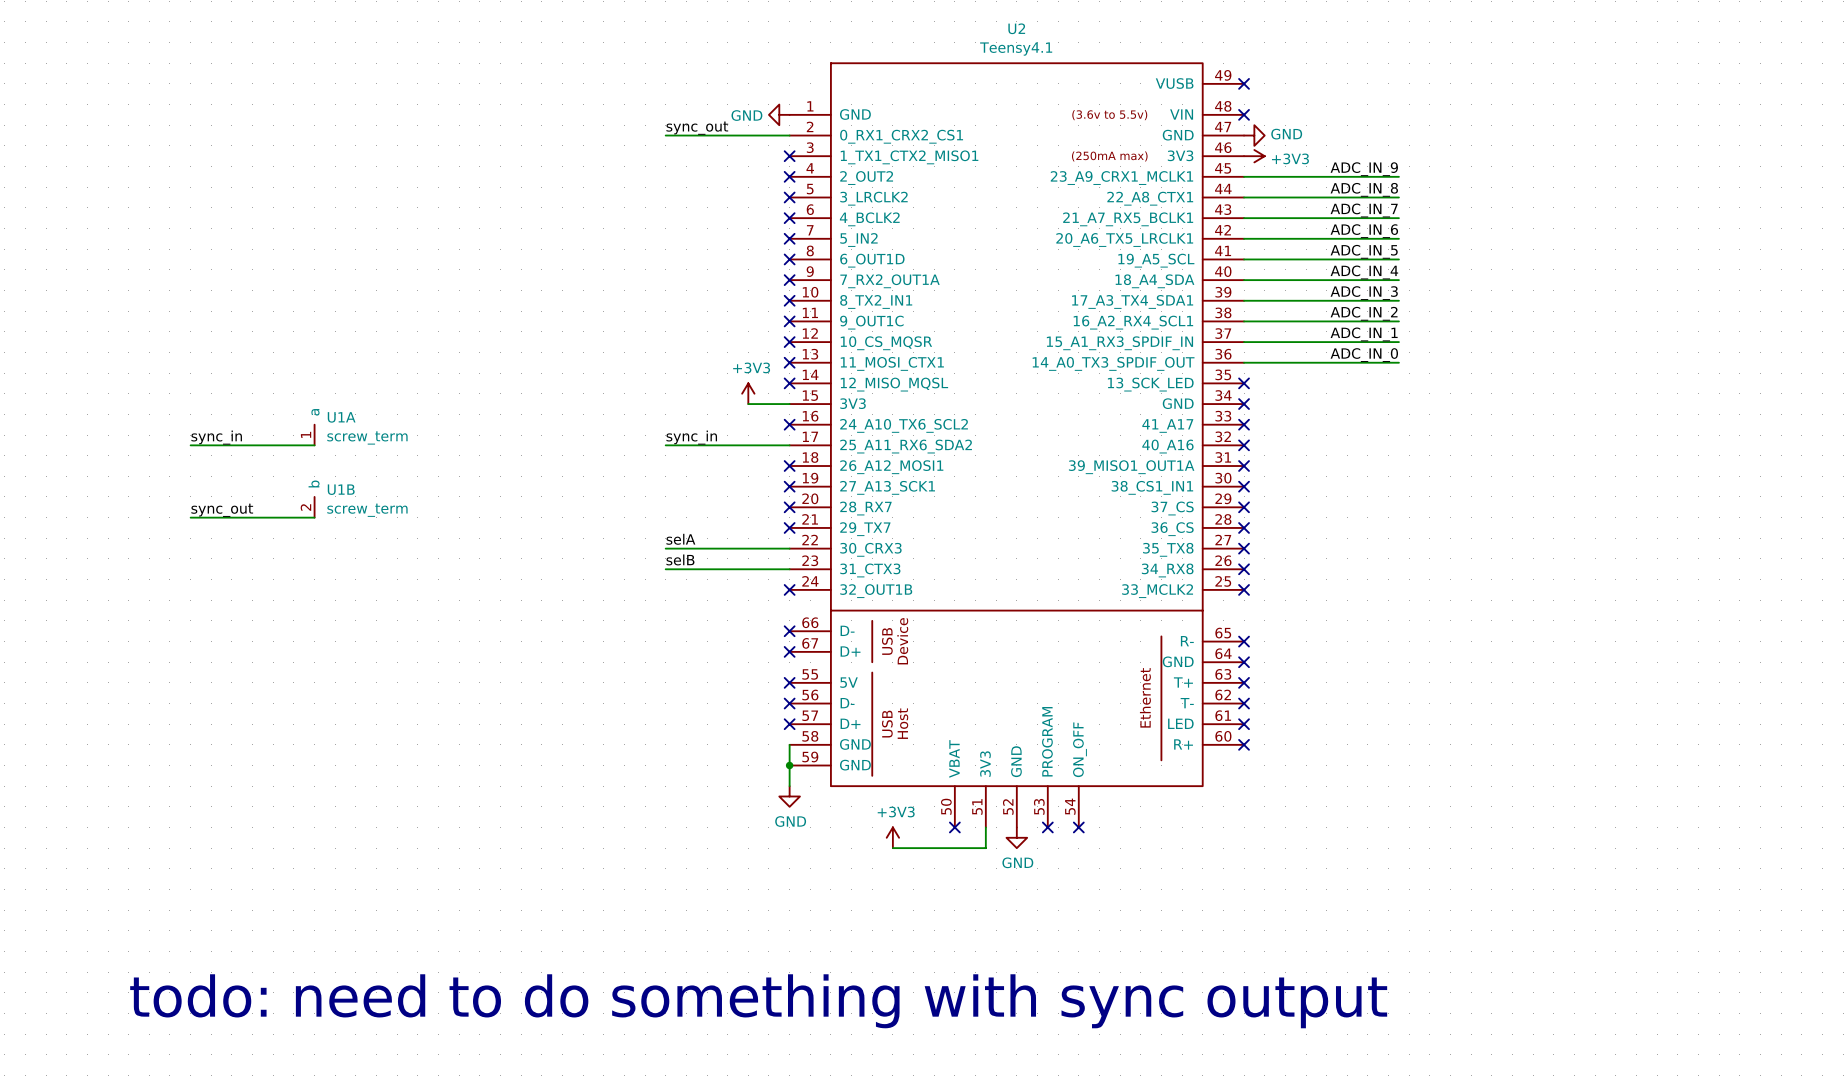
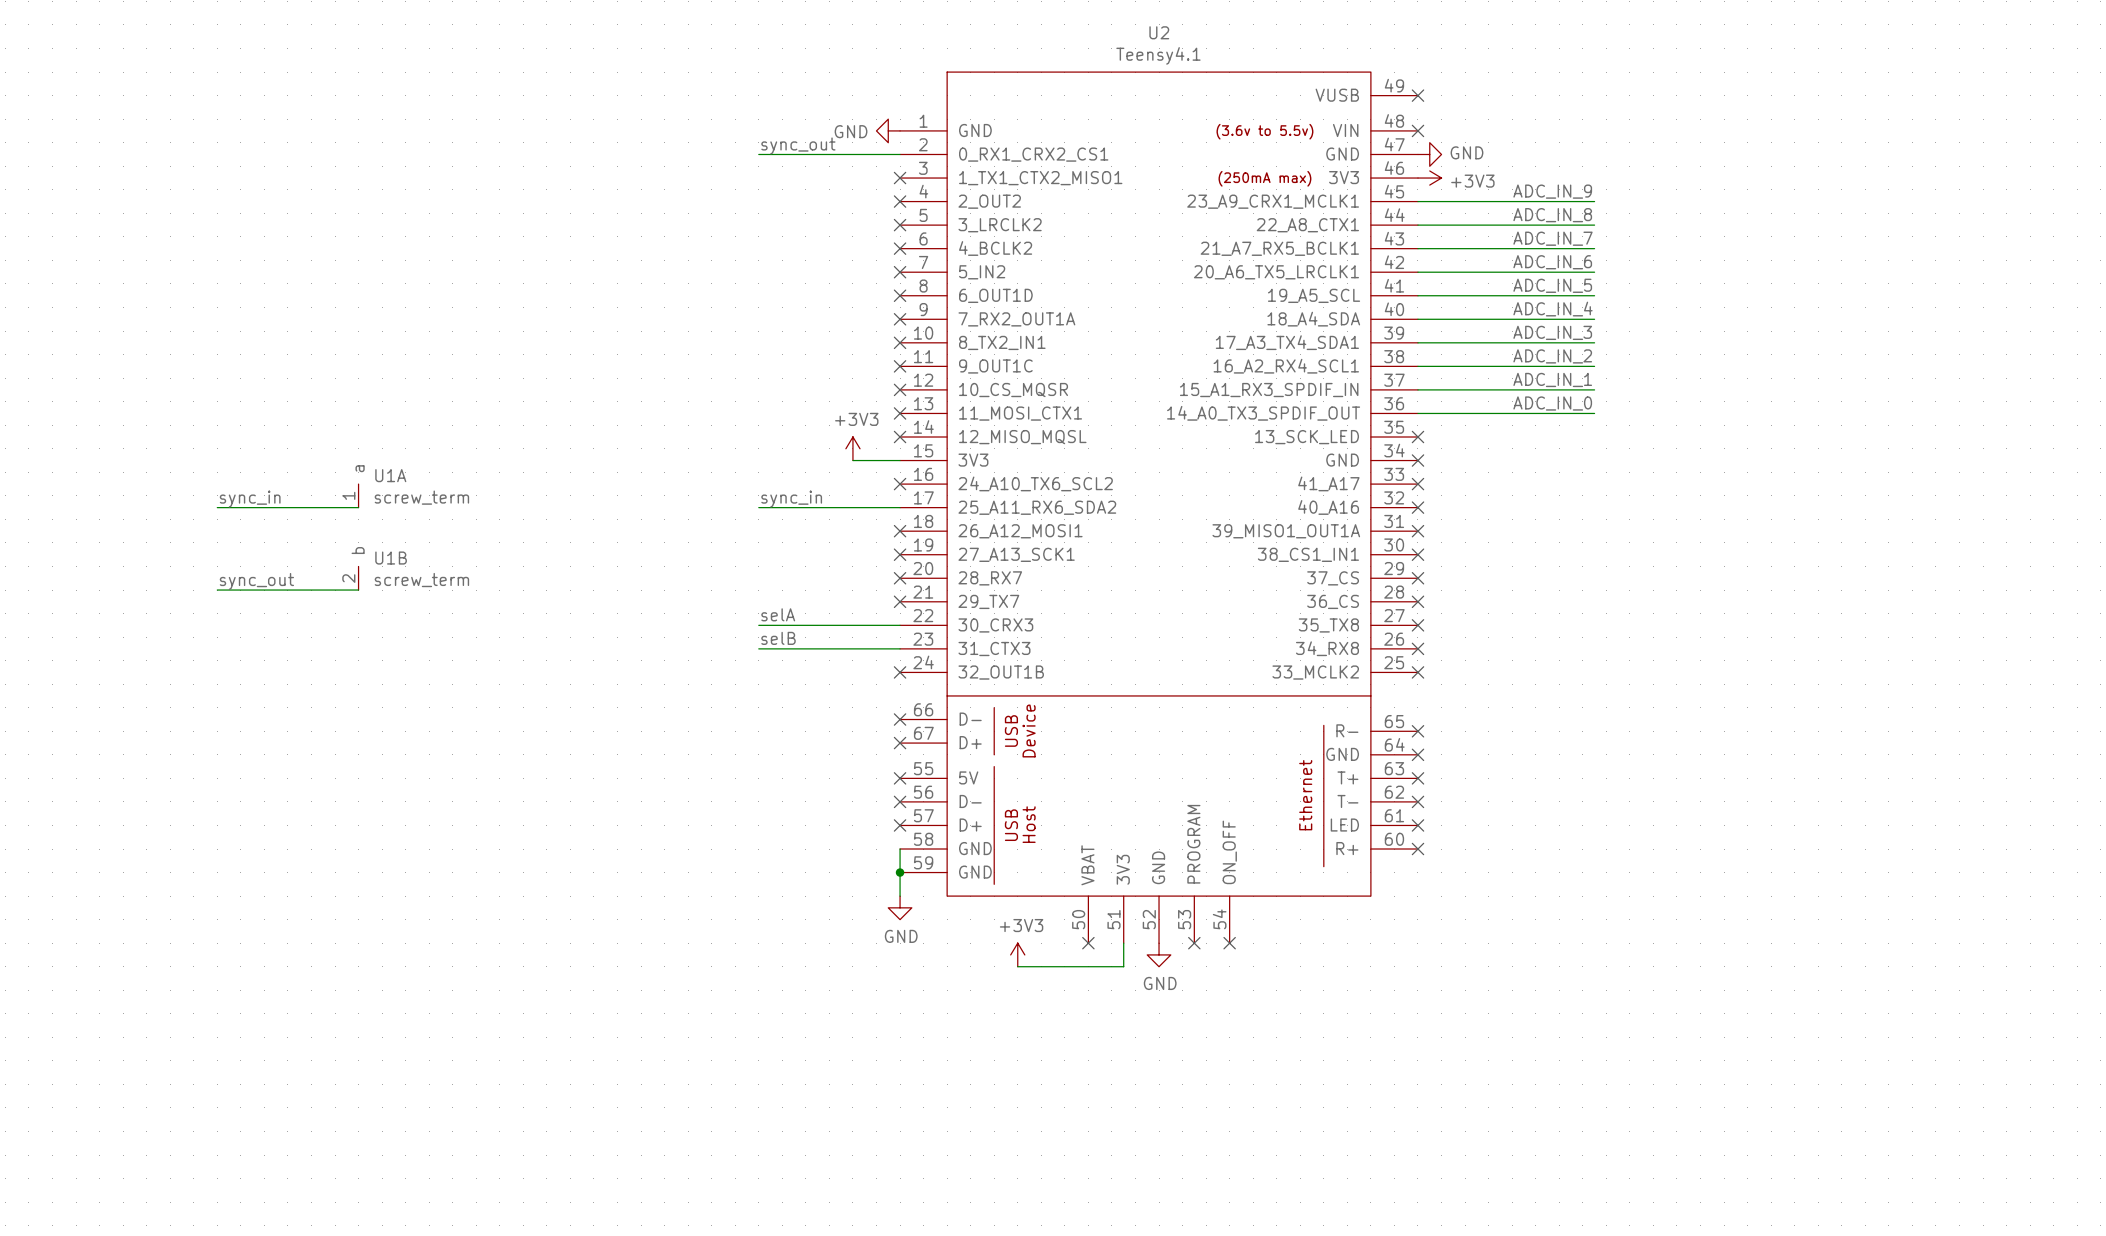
text: todo: need to do something with sync output (758, 1001) -> none

